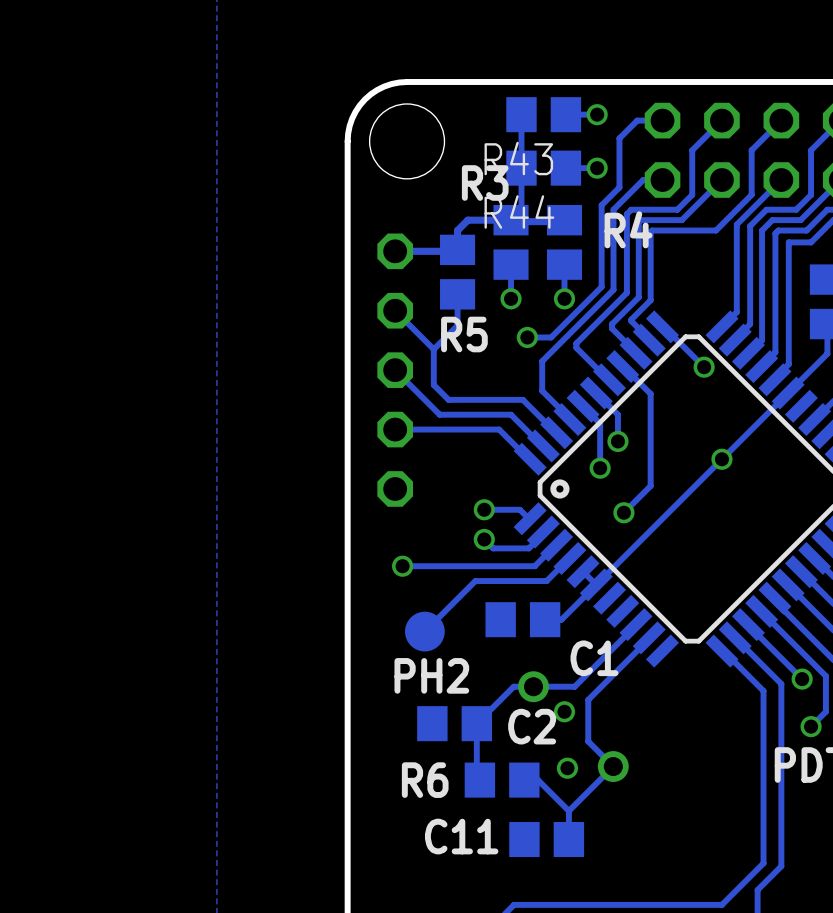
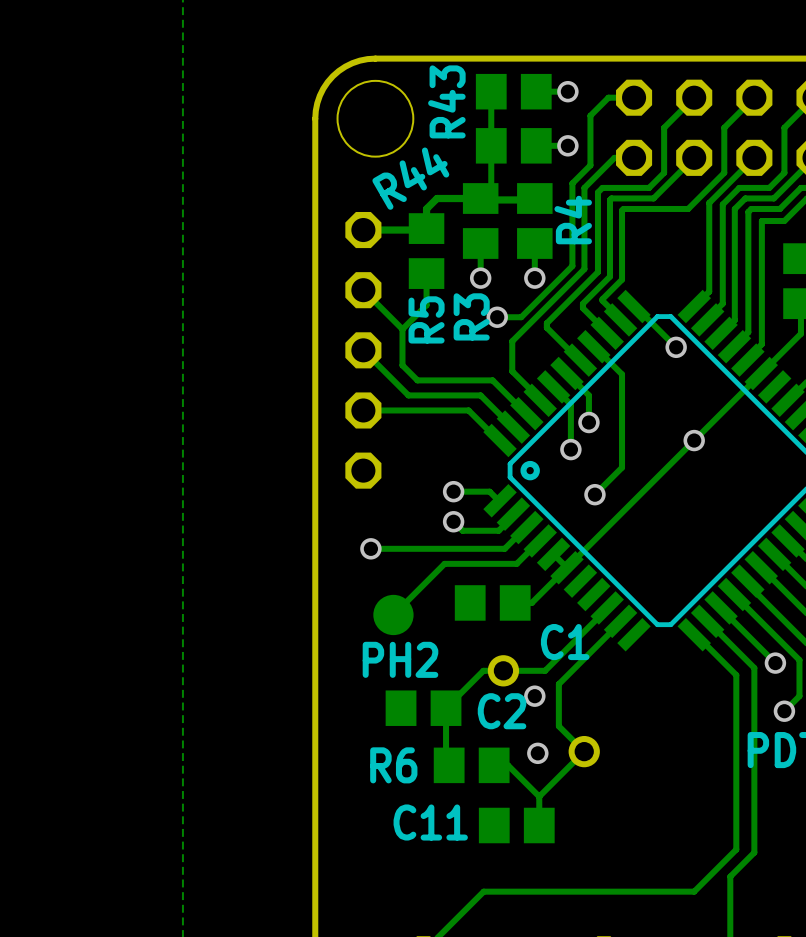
R43 name rotation: 0° (518, 158) -> 90° counterclockwise (446, 101)
R3 name rotation: 0° (485, 182) -> 90° counterclockwise (471, 316)
R3 name position: R3 (485, 182) -> R3 (471, 316)
R44 name rotation: 0° (519, 211) -> 30° counterclockwise (410, 178)
R4 name rotation: 0° (628, 229) -> 90° counterclockwise (573, 220)
R5 name rotation: 0° (464, 334) -> 90° counterclockwise (426, 319)

